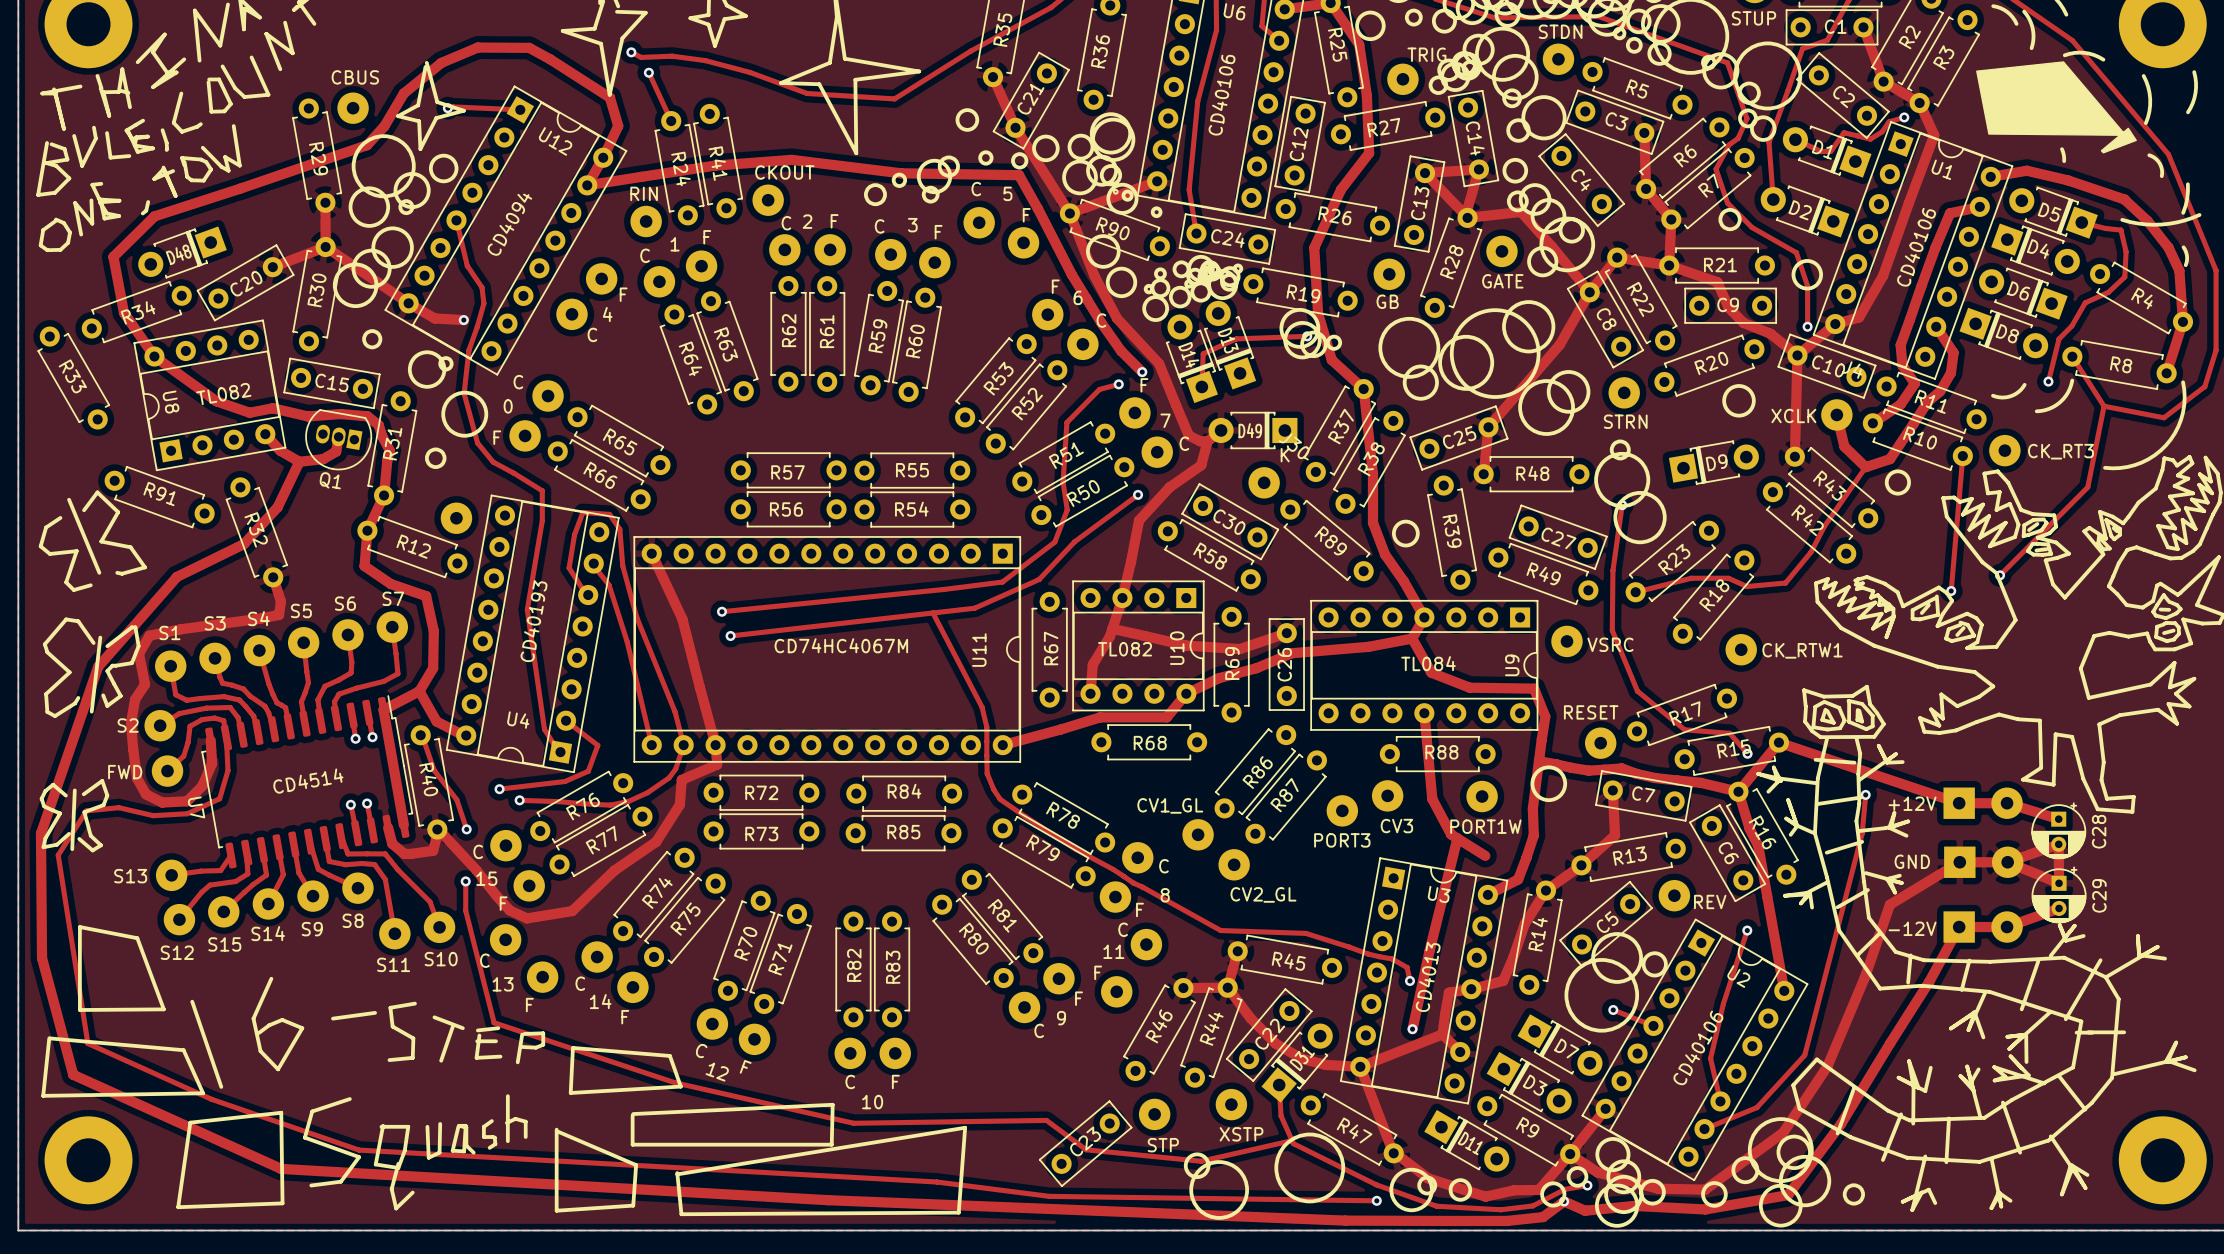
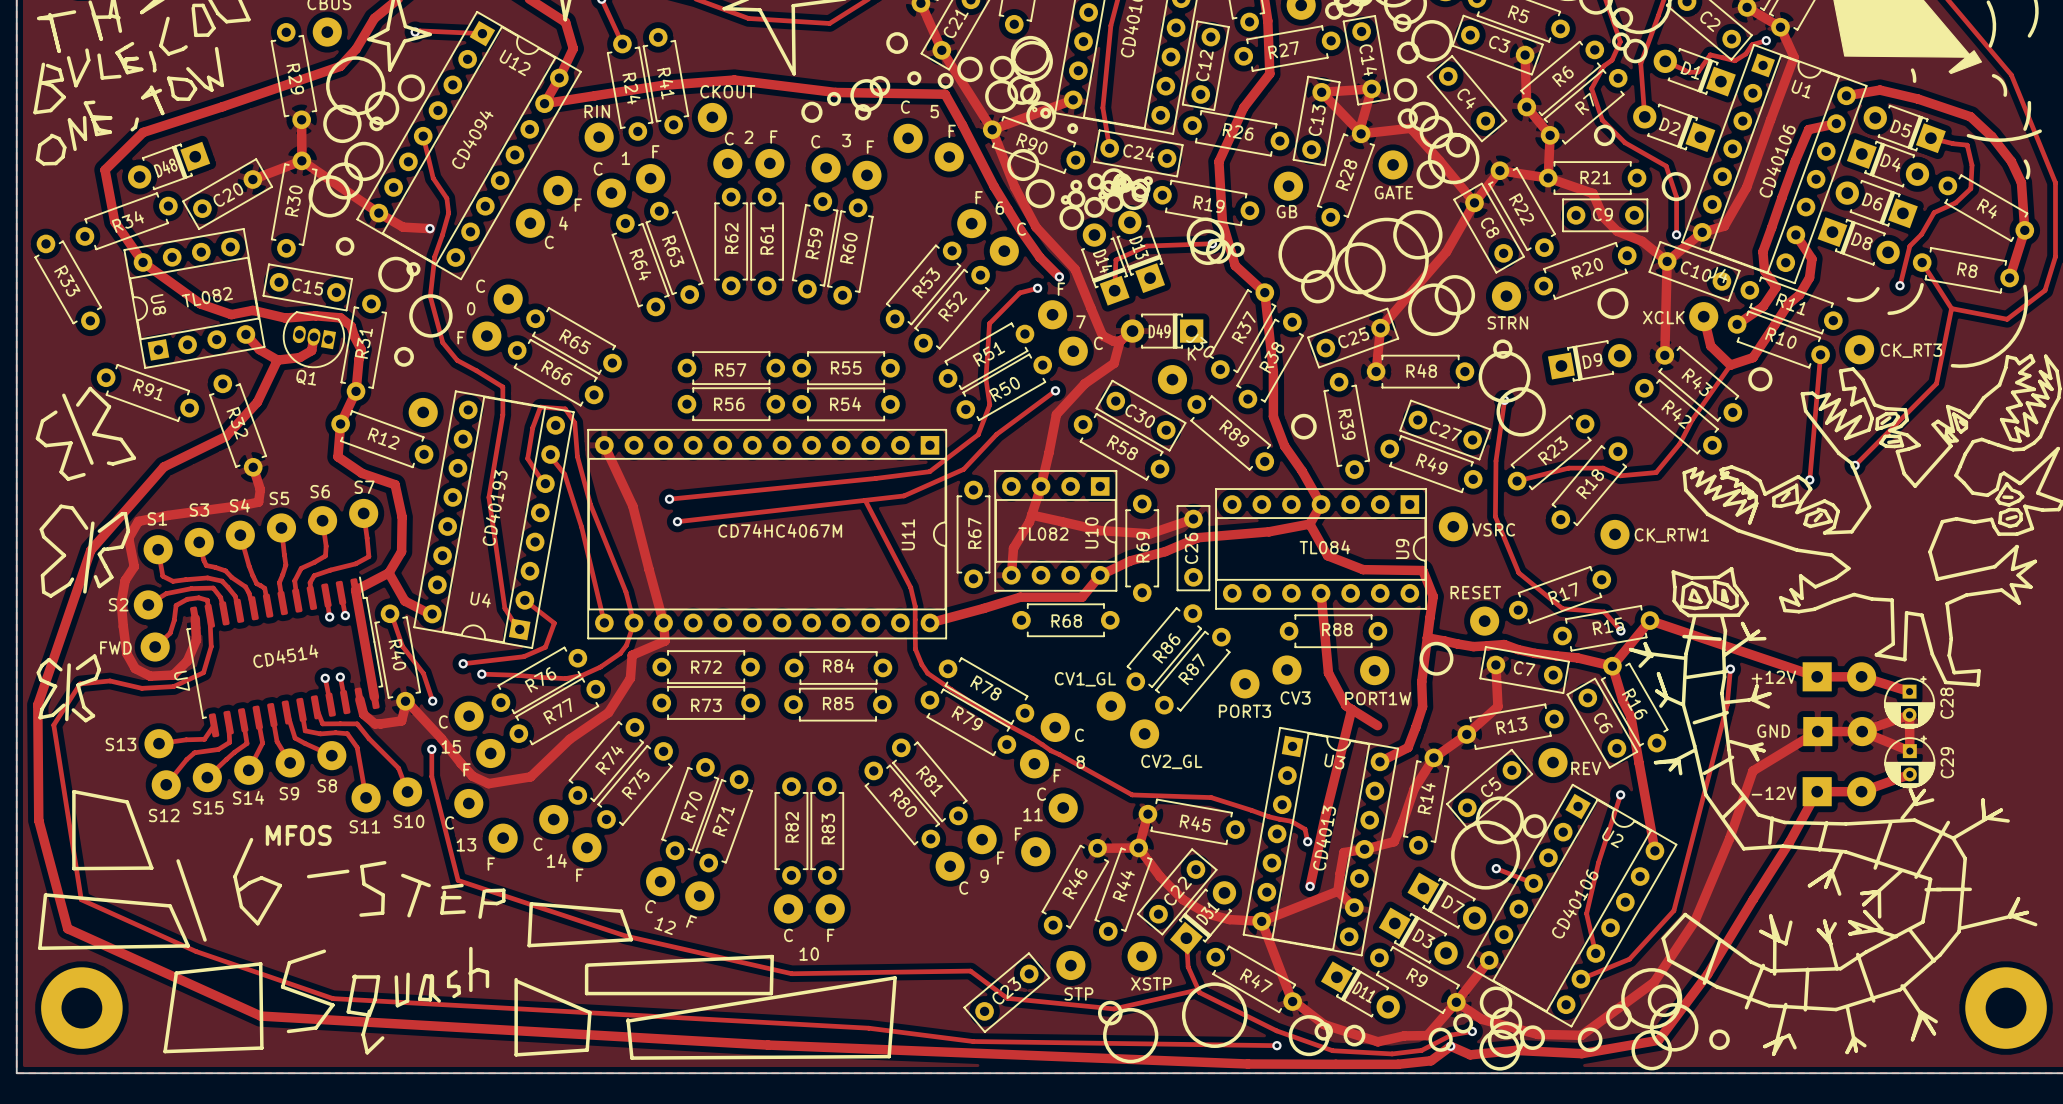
text: none -> MFOS (298, 835)

